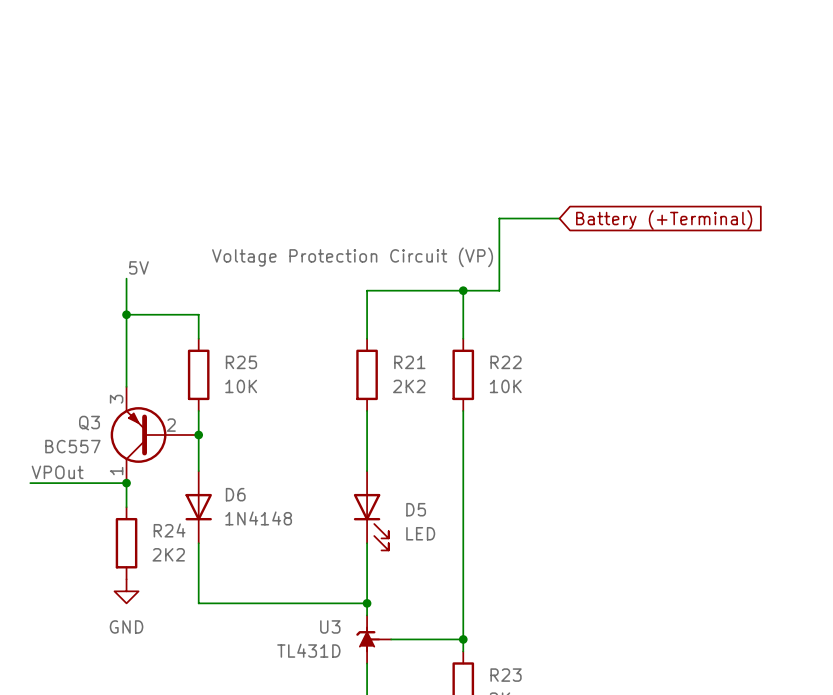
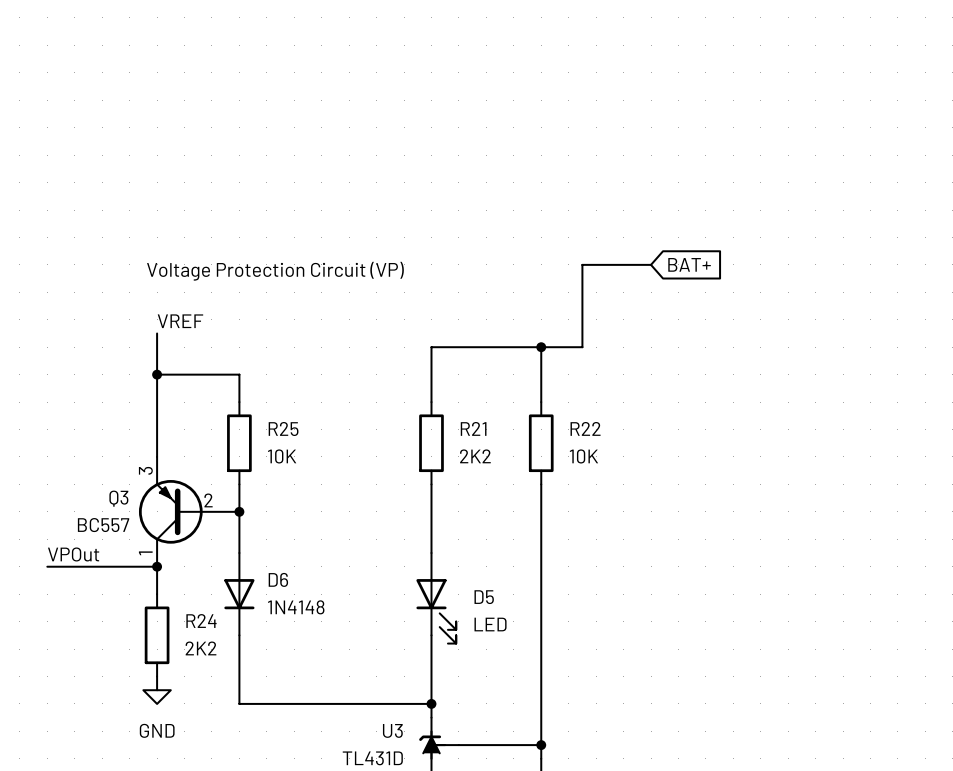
global label: Battery (+Terminal) (664, 219) -> BAT+ (689, 264)
text: none -> Voltage Protection Circuit (VP) (275, 271)
label: Voltage Protection Circuit (VP) (352, 257) -> none
label: 5V (138, 267) -> VREF (180, 321)

